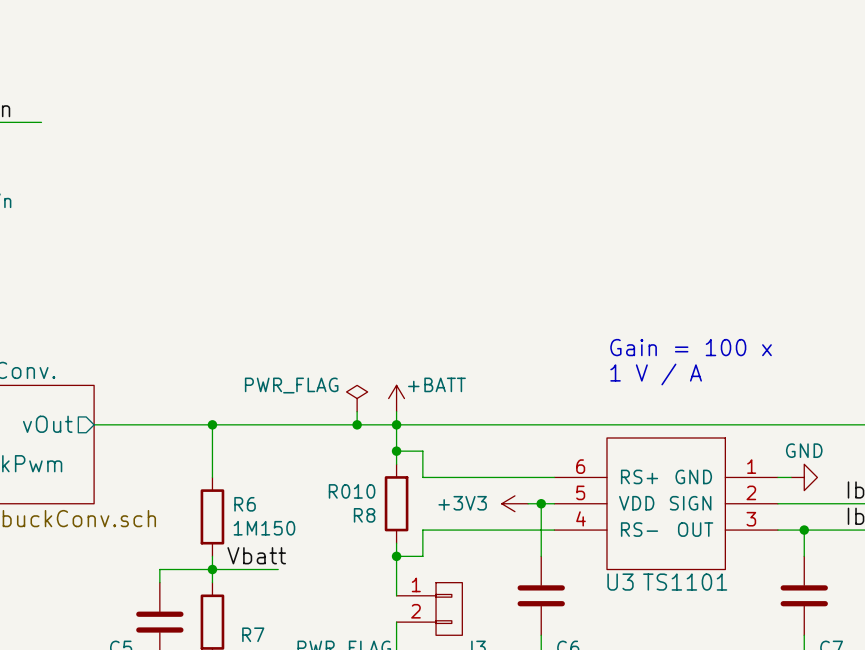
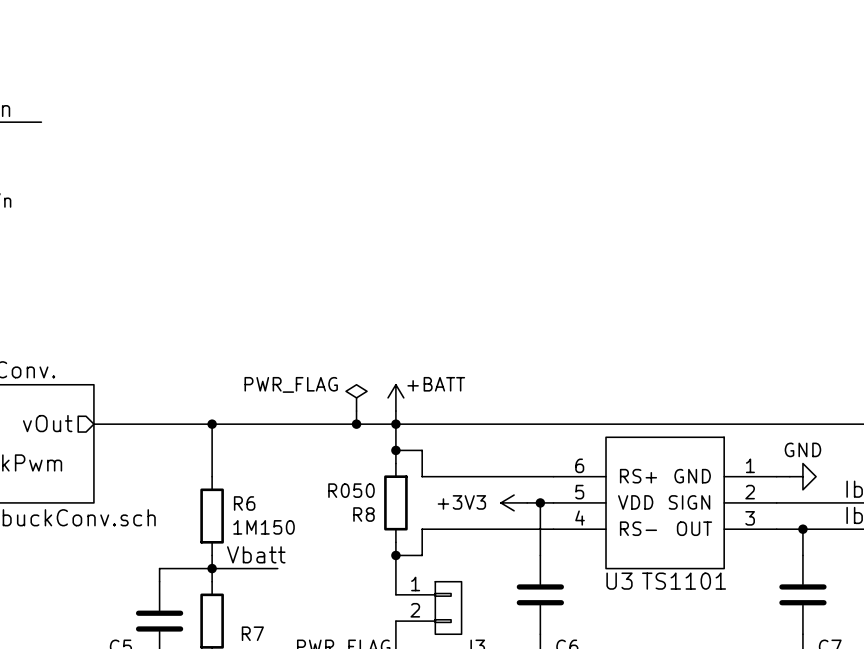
text: Gain = 100 x (691, 347) -> none
text: 1 V / A (656, 374) -> none
R8 value: R010 (352, 491) -> R050 (351, 490)

